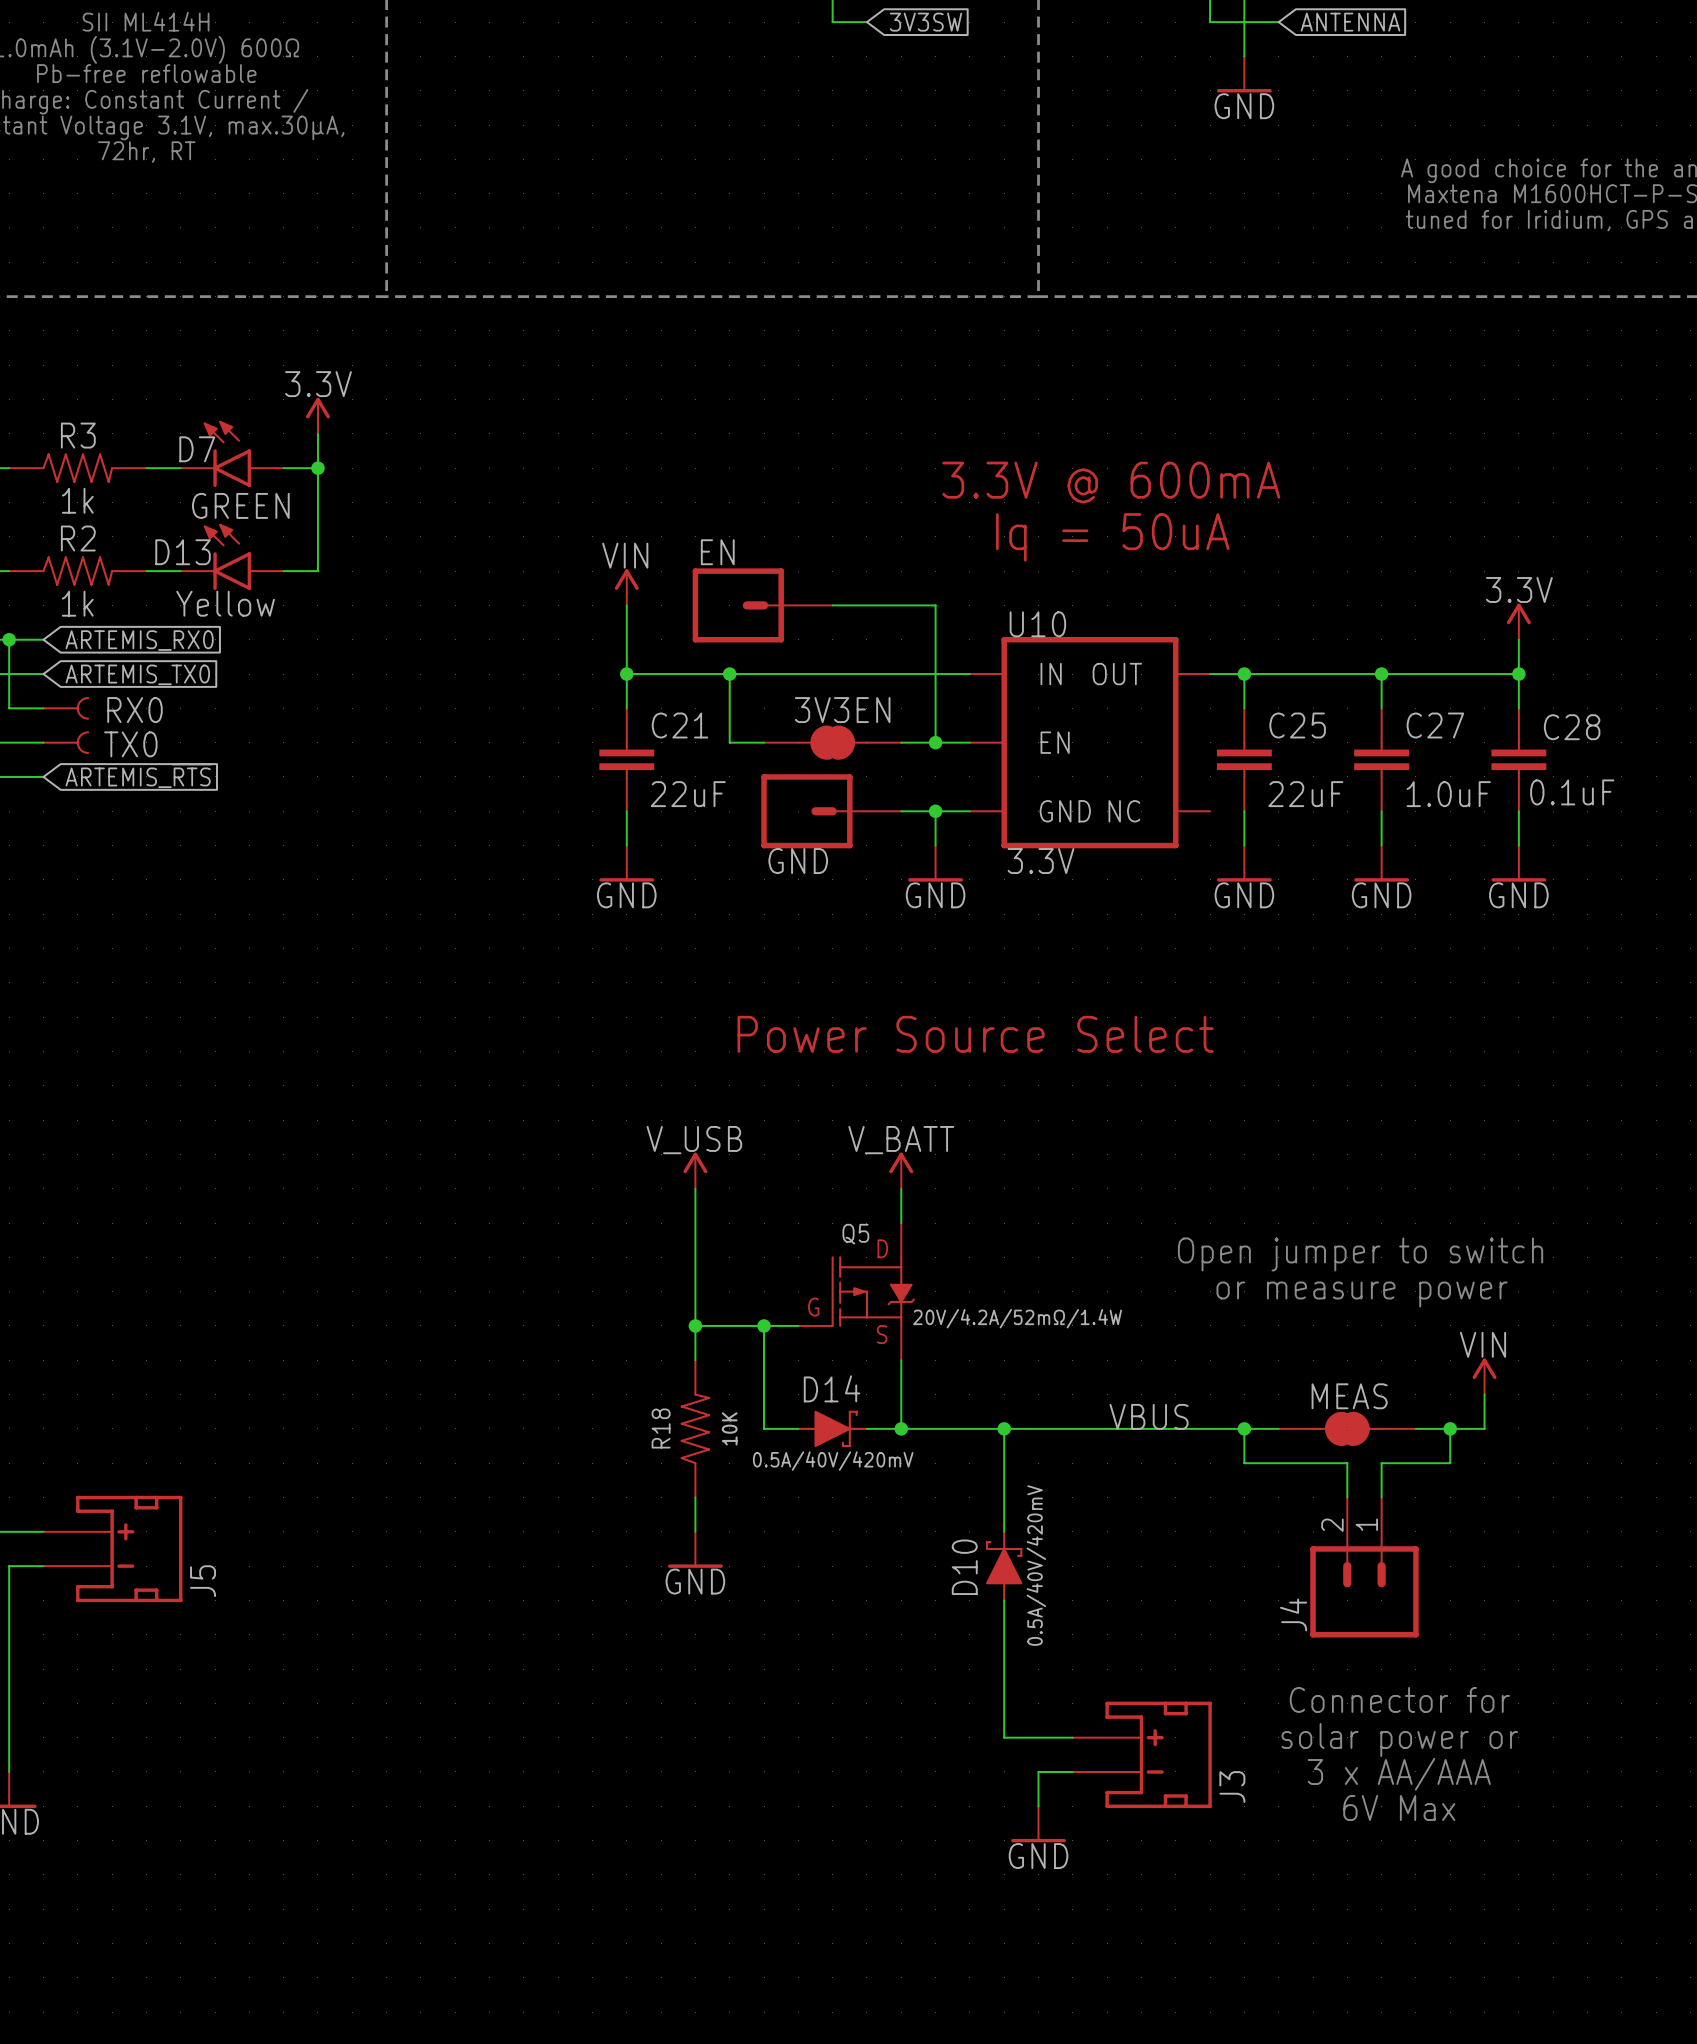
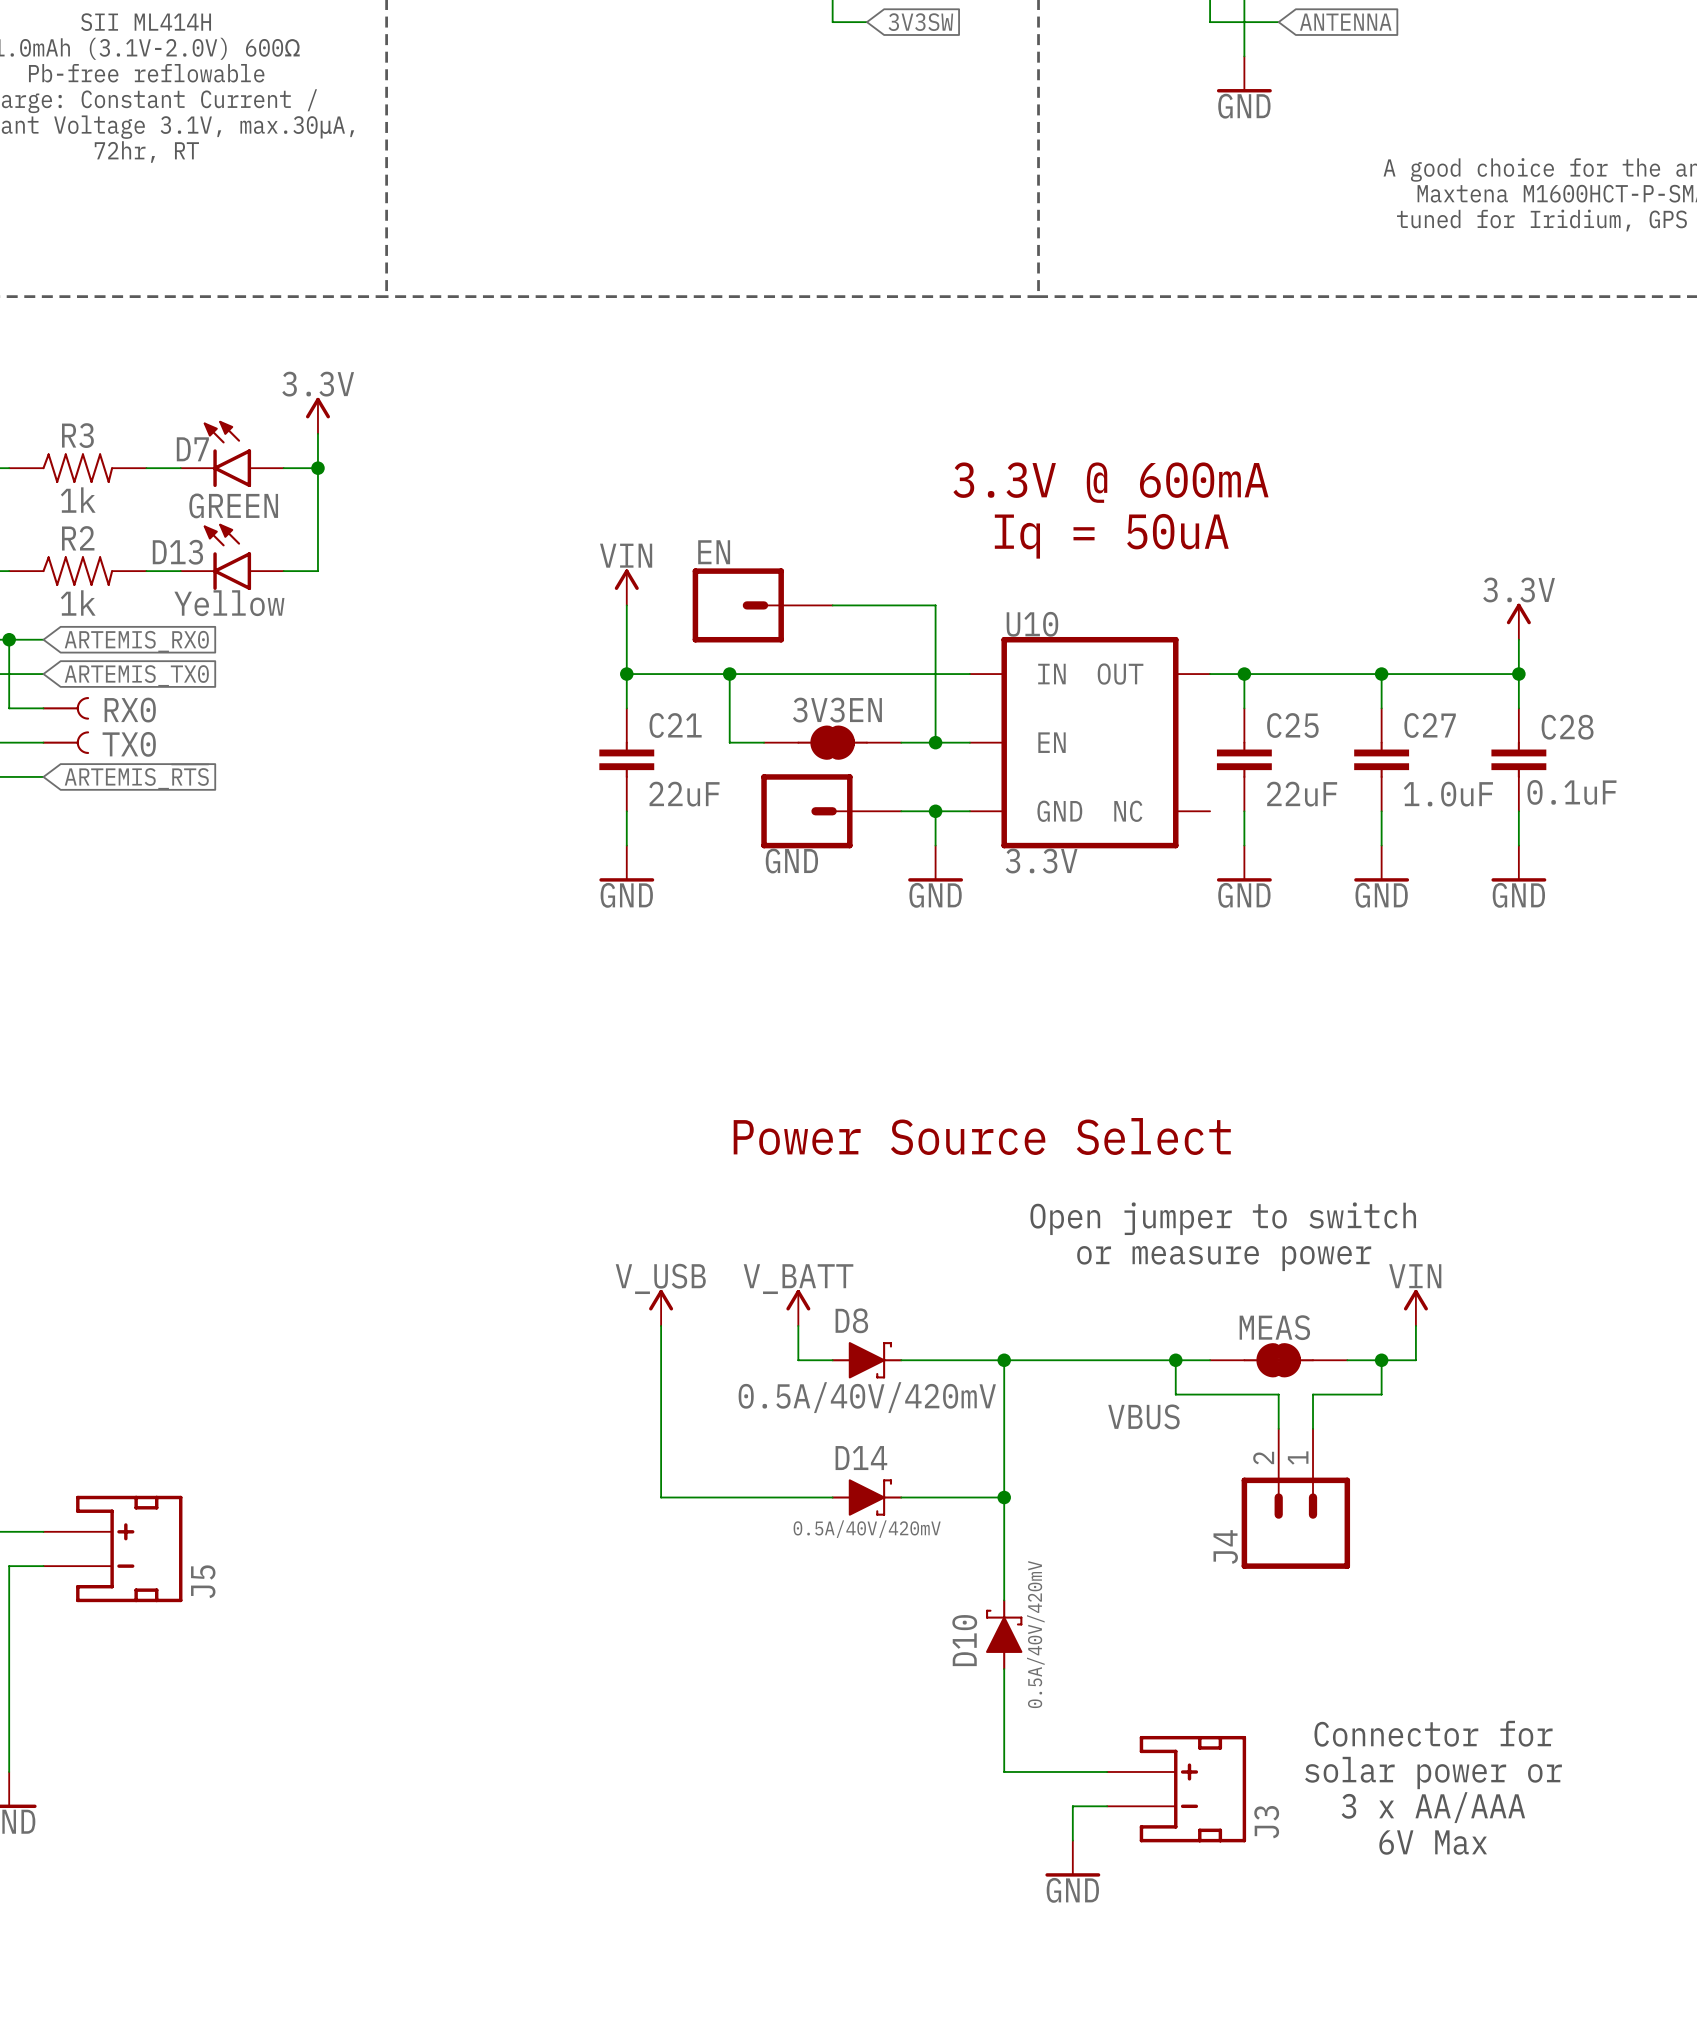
text position: Power Source Select (975, 1034) -> Power Source Select (982, 1136)
power symbol position: V_USB (695, 1170) -> V_USB (661, 1307)
power symbol position: V_BATT (901, 1170) -> V_BATT (798, 1307)
wire: (695, 1188) (695, 1360) -> none
wire: (901, 1188) (901, 1223) -> none
text position: Open jumper to switch (1360, 1254) -> Open jumper to switch (1223, 1218)
Q5: 20V/4.2A/52mΩ/1.4W (856, 1291) -> none
text position: or measure power (1362, 1294) -> or measure power (1224, 1258)
wire: none -> (661, 1325) (661, 1497) (832, 1497)
wire: (695, 1325) (798, 1325) -> (832, 1360) (798, 1360) (798, 1325)
junction: (695, 1325) -> none
wire: (764, 1325) (764, 1428) (798, 1428) -> none
junction: (764, 1325) -> none
D8: none -> 0.5A/40V/420mV (866, 1360)
wire: (901, 1360) (901, 1428) -> (901, 1360) (1210, 1360)
wire: none -> (1004, 1360) (1004, 1428)
junction: none -> (1004, 1360)
junction: none -> (1175, 1360)
junction: none -> (1381, 1360)
power symbol position: VIN (1484, 1376) -> VIN (1415, 1307)
wire: (1484, 1394) (1484, 1428) (1415, 1428) -> (1415, 1325) (1415, 1360) (1347, 1360)
R18: 10K (695, 1428) -> none
D14 position: (832, 1428) -> (866, 1497)
wire: (866, 1428) (1278, 1428) -> (1175, 1360) (1175, 1394) (1278, 1394) (1278, 1428)
junction: (901, 1428) -> none
junction: (1004, 1428) -> none
wire: (1244, 1428) (1244, 1463) (1347, 1463) (1347, 1497) -> none
junction: (1244, 1428) -> none
MEAS position: (1347, 1428) -> (1278, 1360)
wire: (1450, 1428) (1450, 1463) (1381, 1463) (1381, 1497) -> (1381, 1360) (1381, 1394) (1313, 1394) (1313, 1428)
junction: (1450, 1428) -> none
wire: (695, 1497) (695, 1531) -> none
wire: none -> (901, 1497) (1004, 1497)
junction: none -> (1004, 1497)
power symbol: GND (695, 1549) -> none
D10 position: (1004, 1566) -> (1004, 1634)
J4 position: (1364, 1567) -> (1295, 1498)
text position: Connector for (1399, 1699) -> Connector for (1433, 1733)
wire: (1004, 1737) (1072, 1737) -> (1004, 1737) (1004, 1771) (1038, 1771)
text position: solar power or (1399, 1739) -> solar power or (1433, 1772)
J3 position: (1142, 1754) -> (1176, 1789)
wire: (1038, 1771) (1038, 1806) -> none
text position: 3 x AA/AAA (1399, 1774) -> 3 x AA/AAA (1433, 1807)
wire: none -> (1107, 1806) (1072, 1806) (1072, 1840)
text position: 6V Max (1399, 1808) -> 6V Max (1433, 1842)
power symbol position: GND (1038, 1824) -> GND (1072, 1858)

